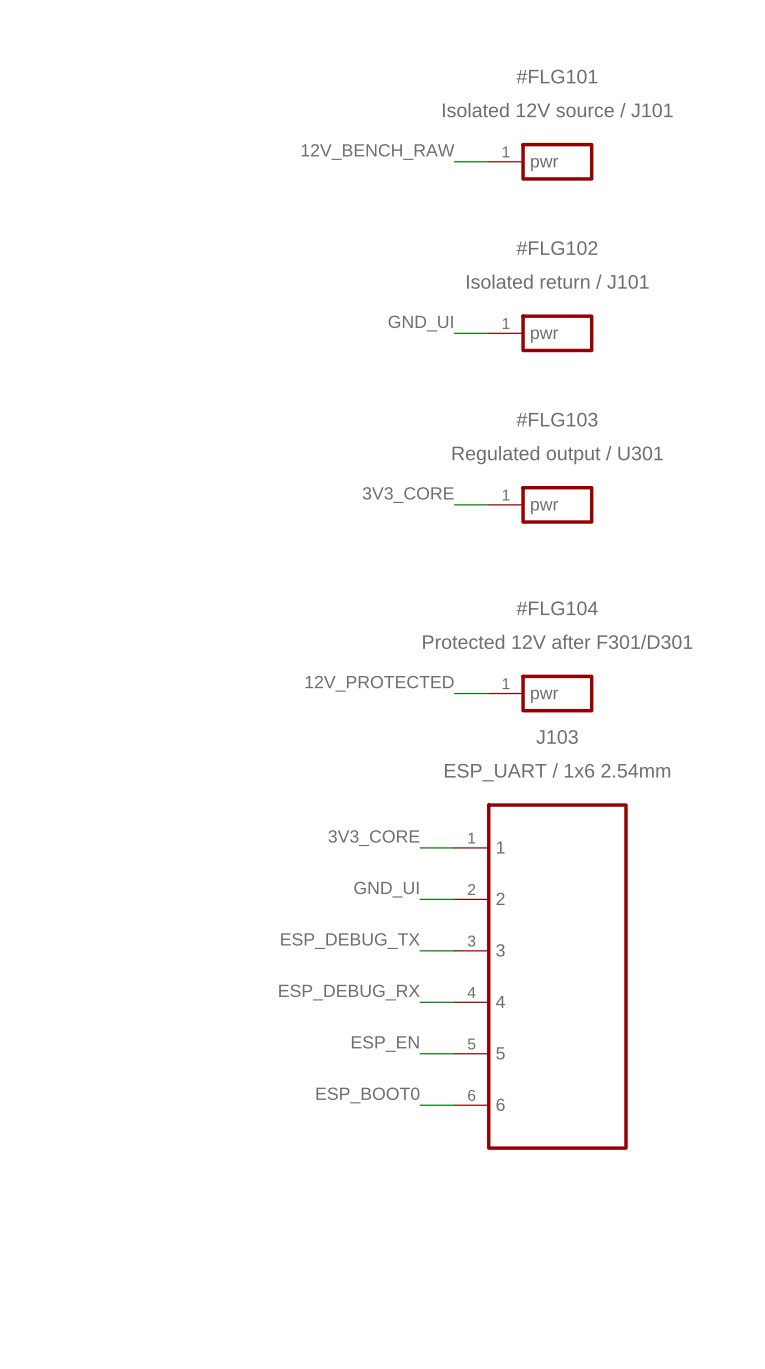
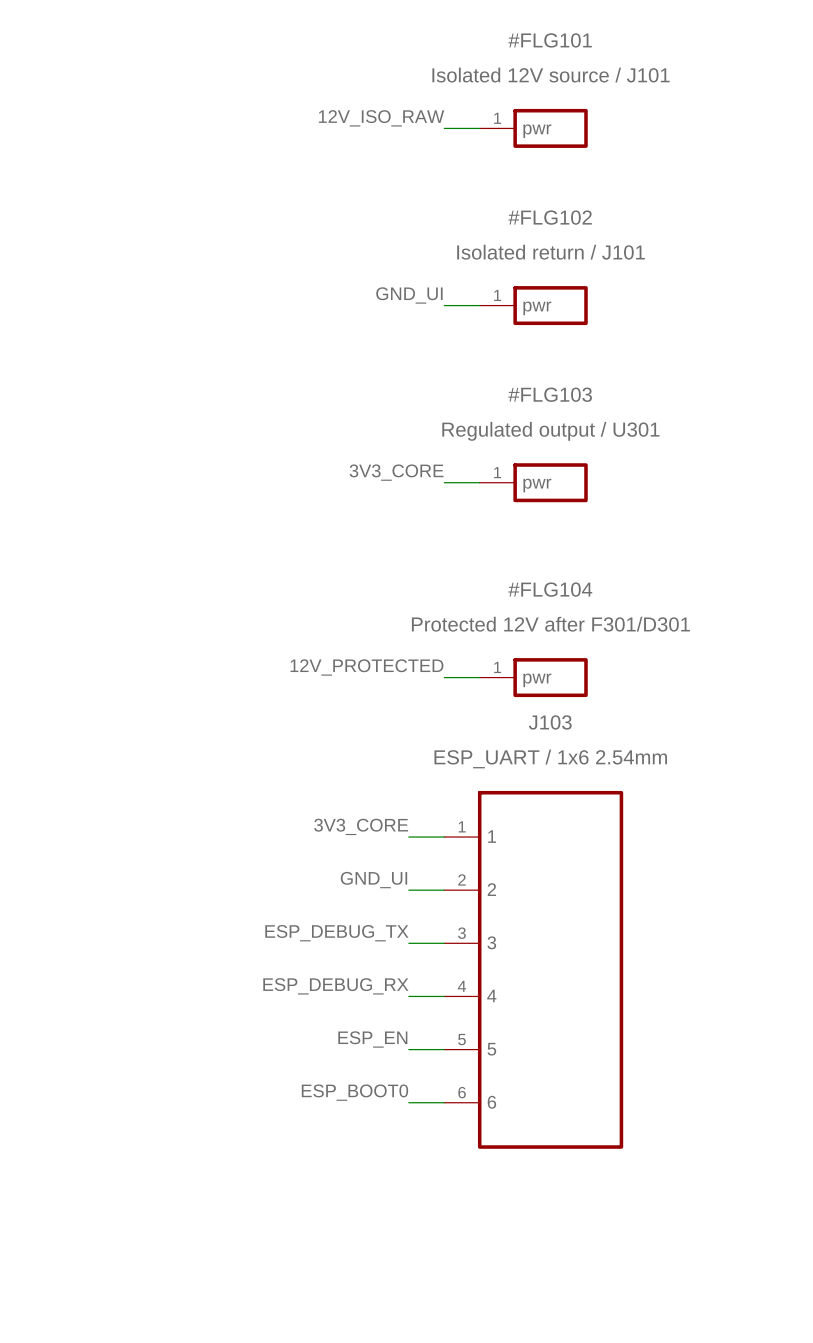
label: 12V_BENCH_RAW (378, 152) -> 12V_ISO_RAW (381, 118)

